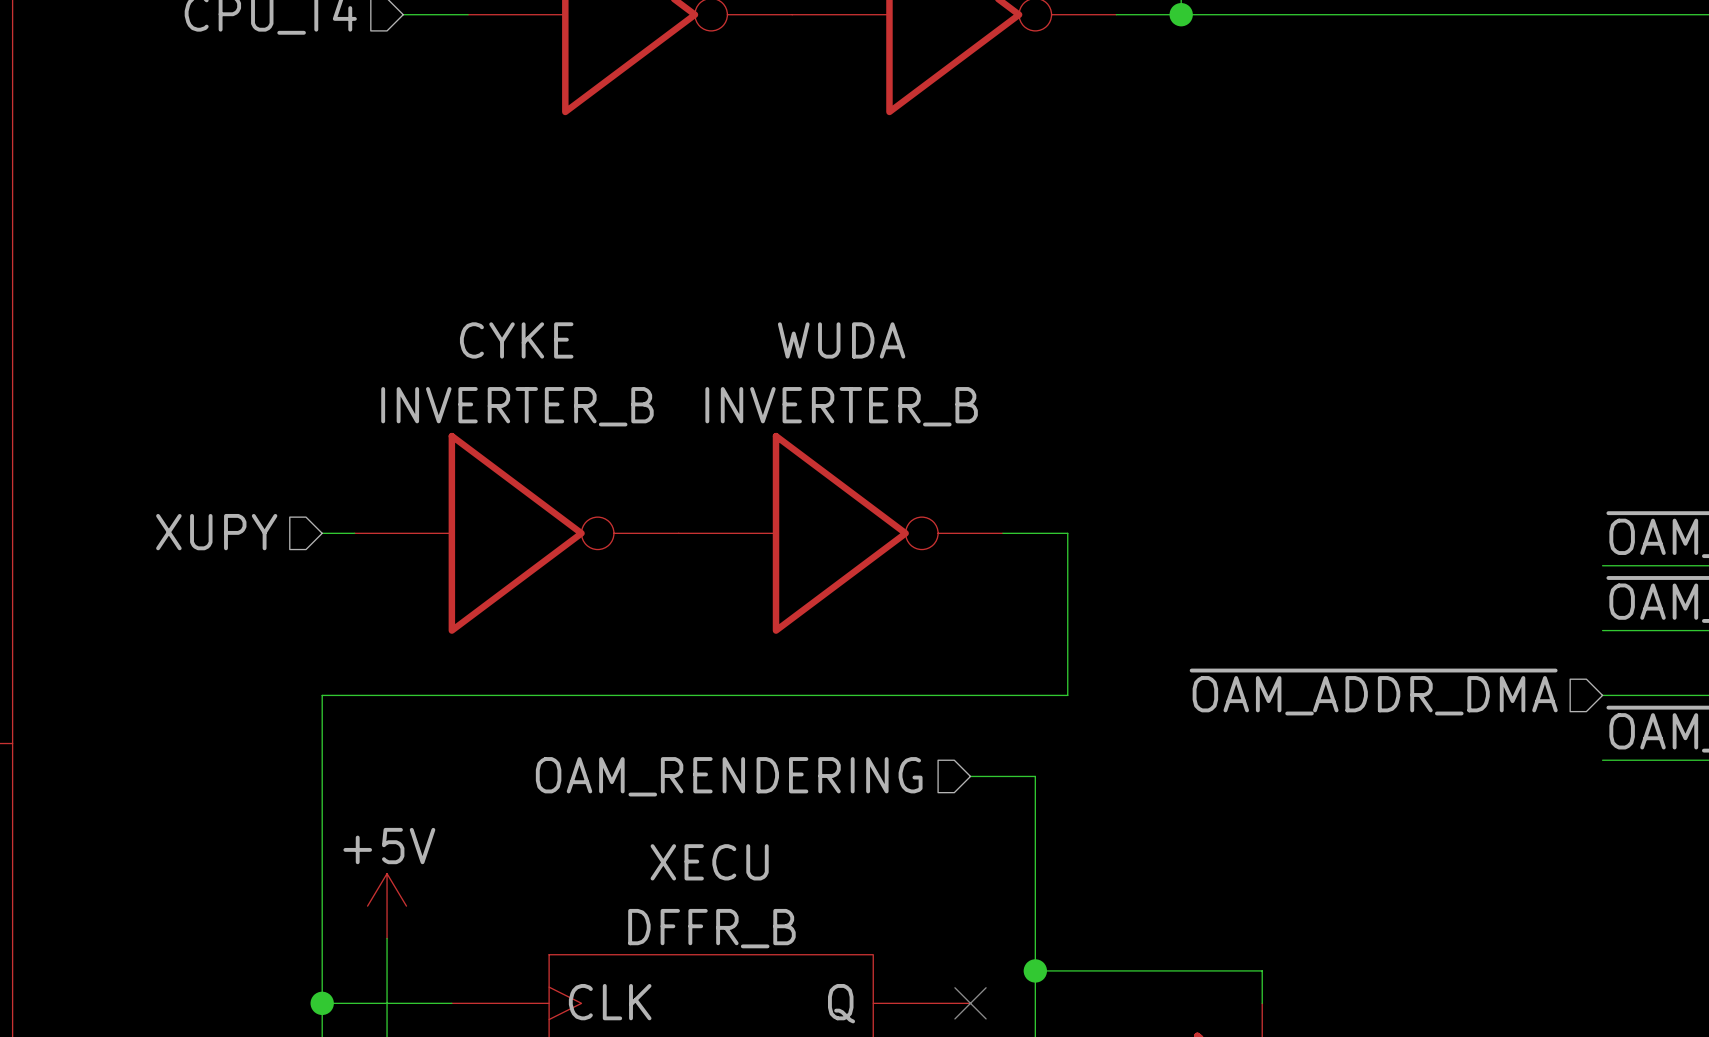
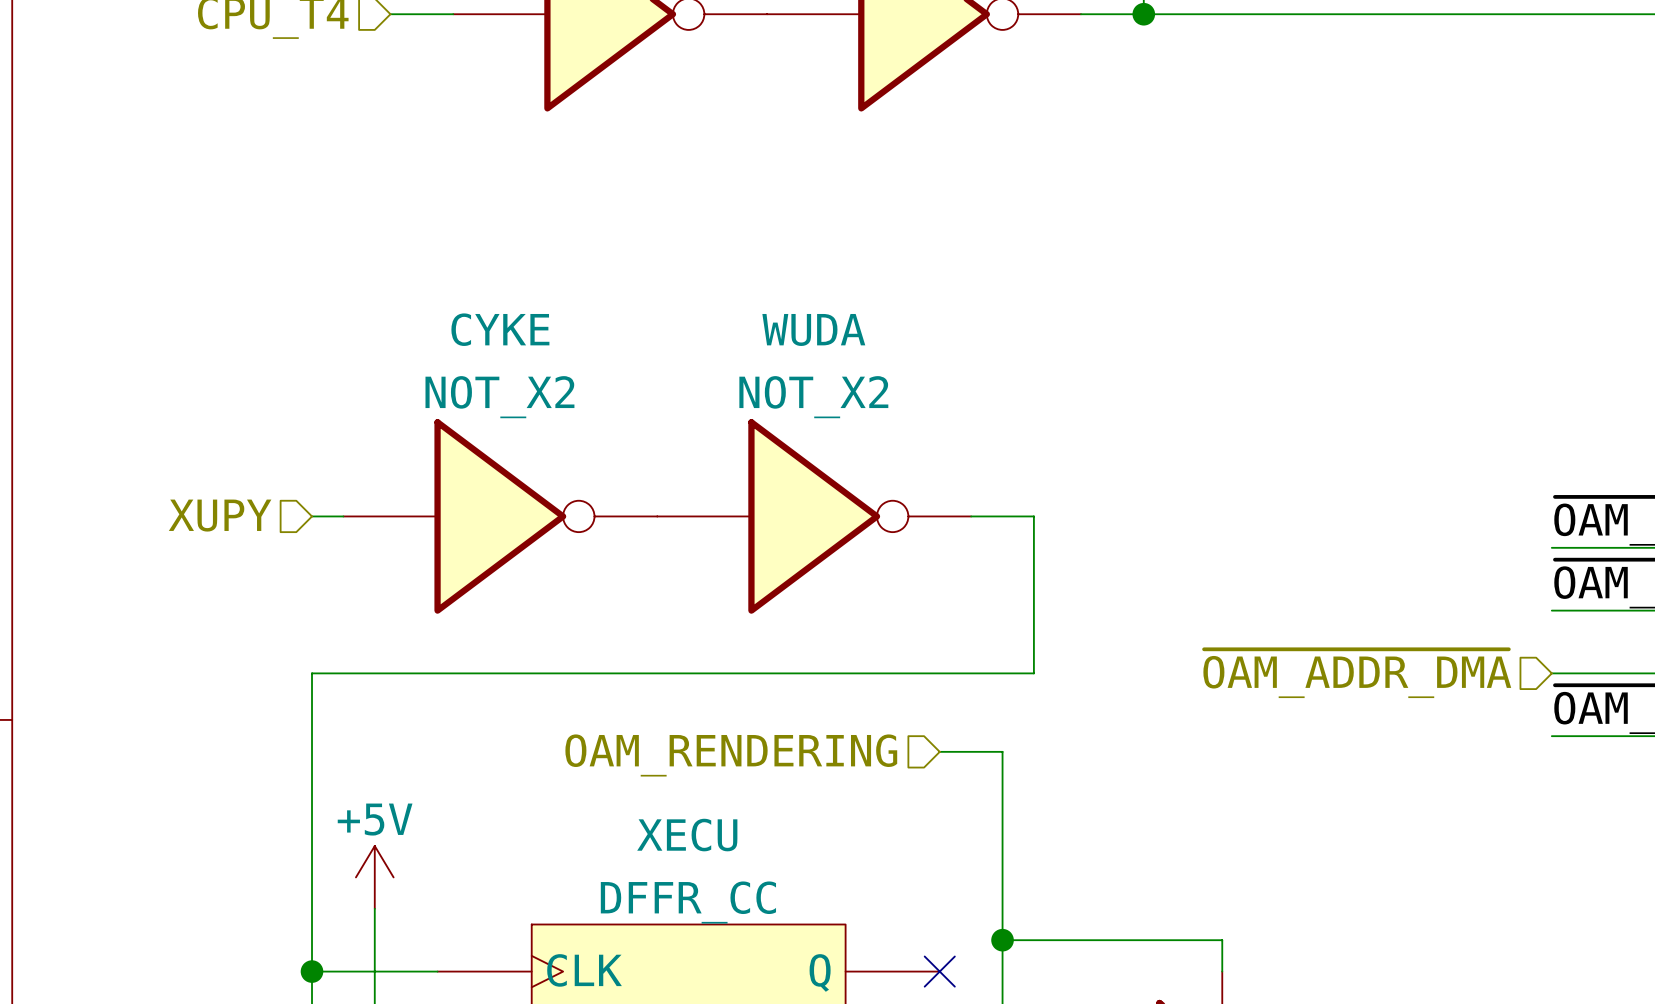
CYKE value: INVERTER_B (517, 406) -> NOT_X2 (499, 397)
WUDA value: INVERTER_B (841, 406) -> NOT_X2 (813, 397)
XECU value: DFFR_B (711, 928) -> DFFR_CC (688, 902)

